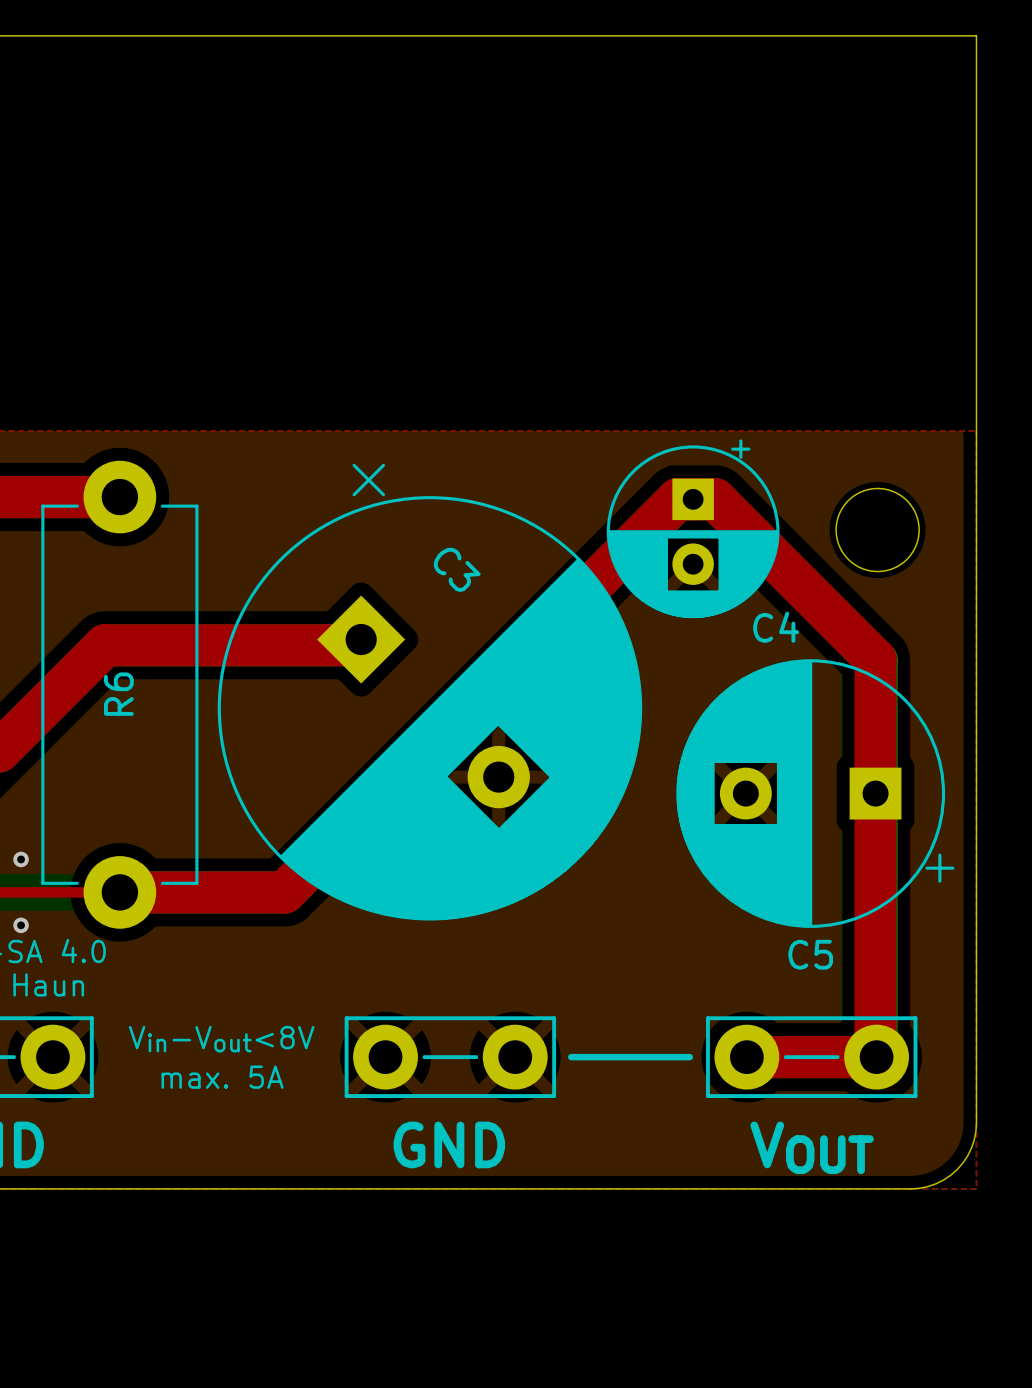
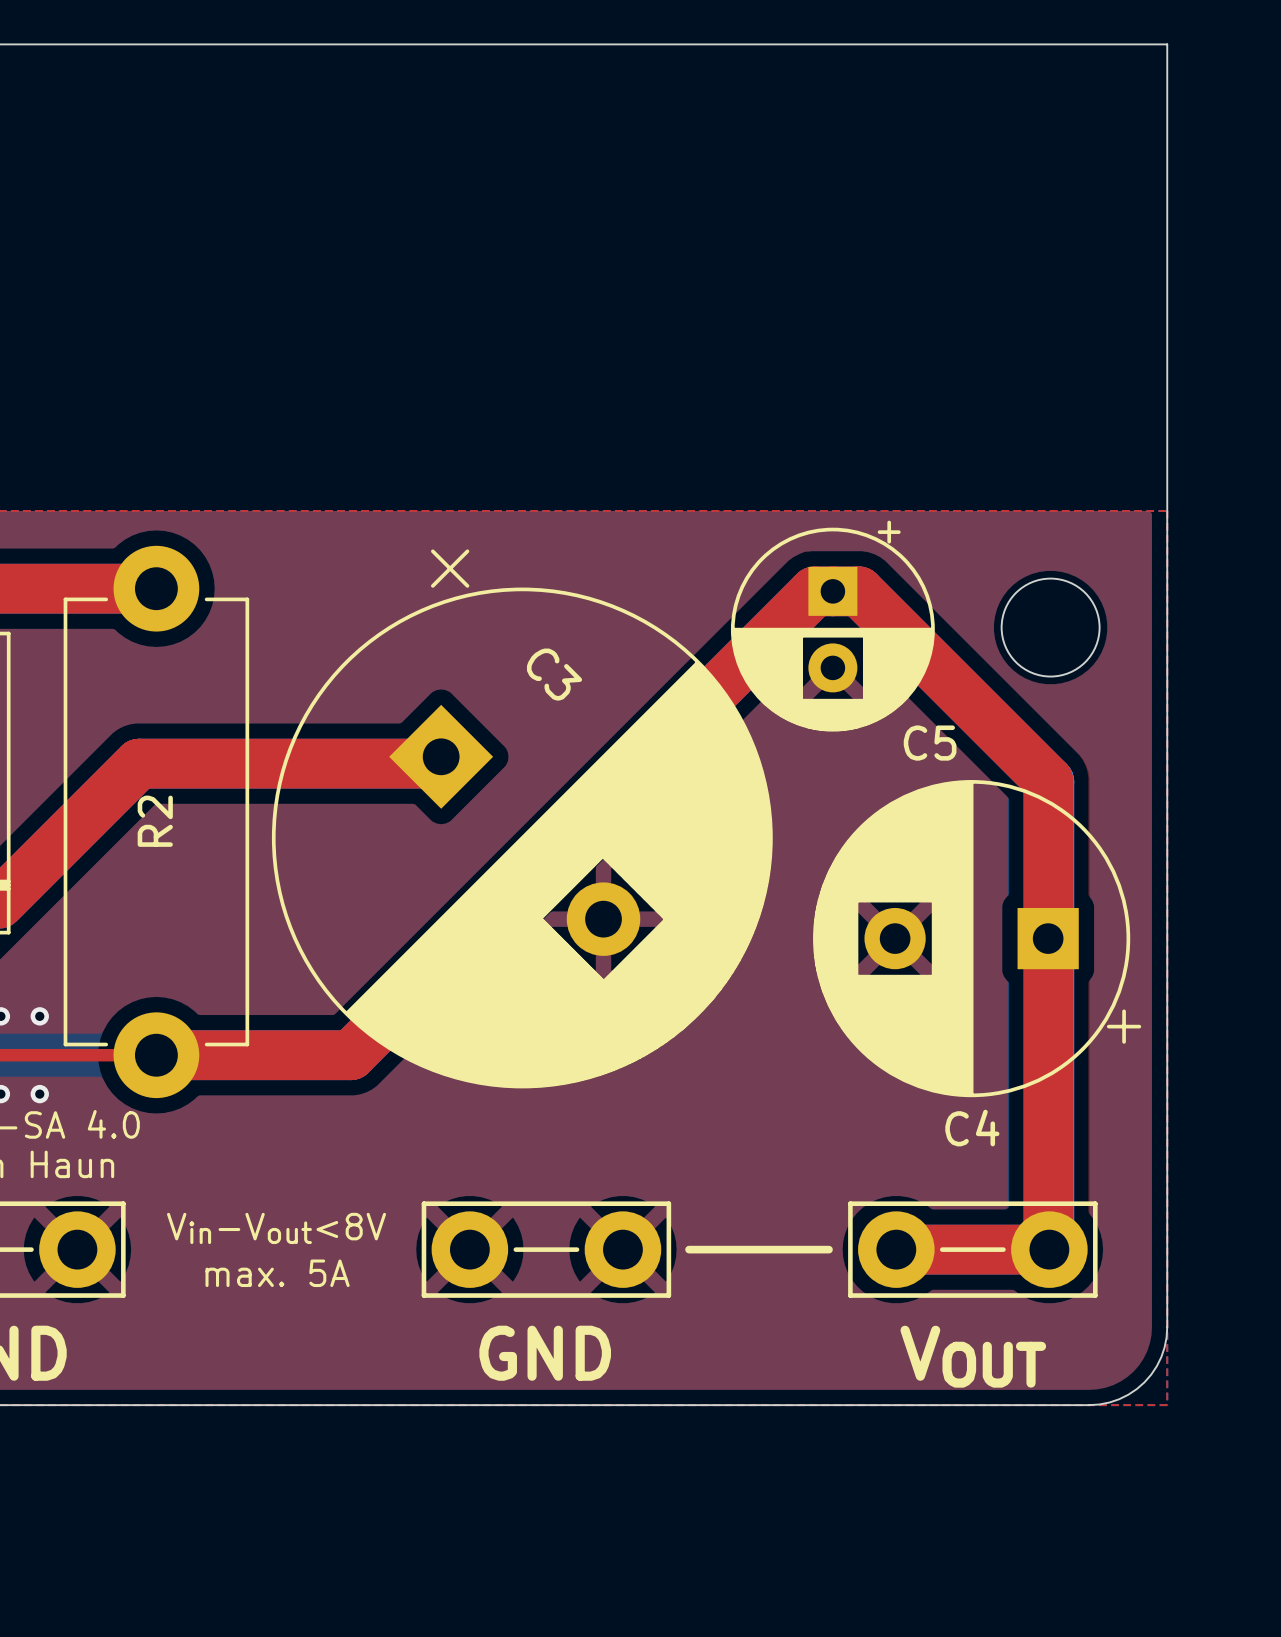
C4 name: C4 (776, 627) -> C5 (930, 743)
R6 name: R6 (118, 694) -> R2 (155, 821)
C5 name: C5 (810, 954) -> C4 (972, 1128)

